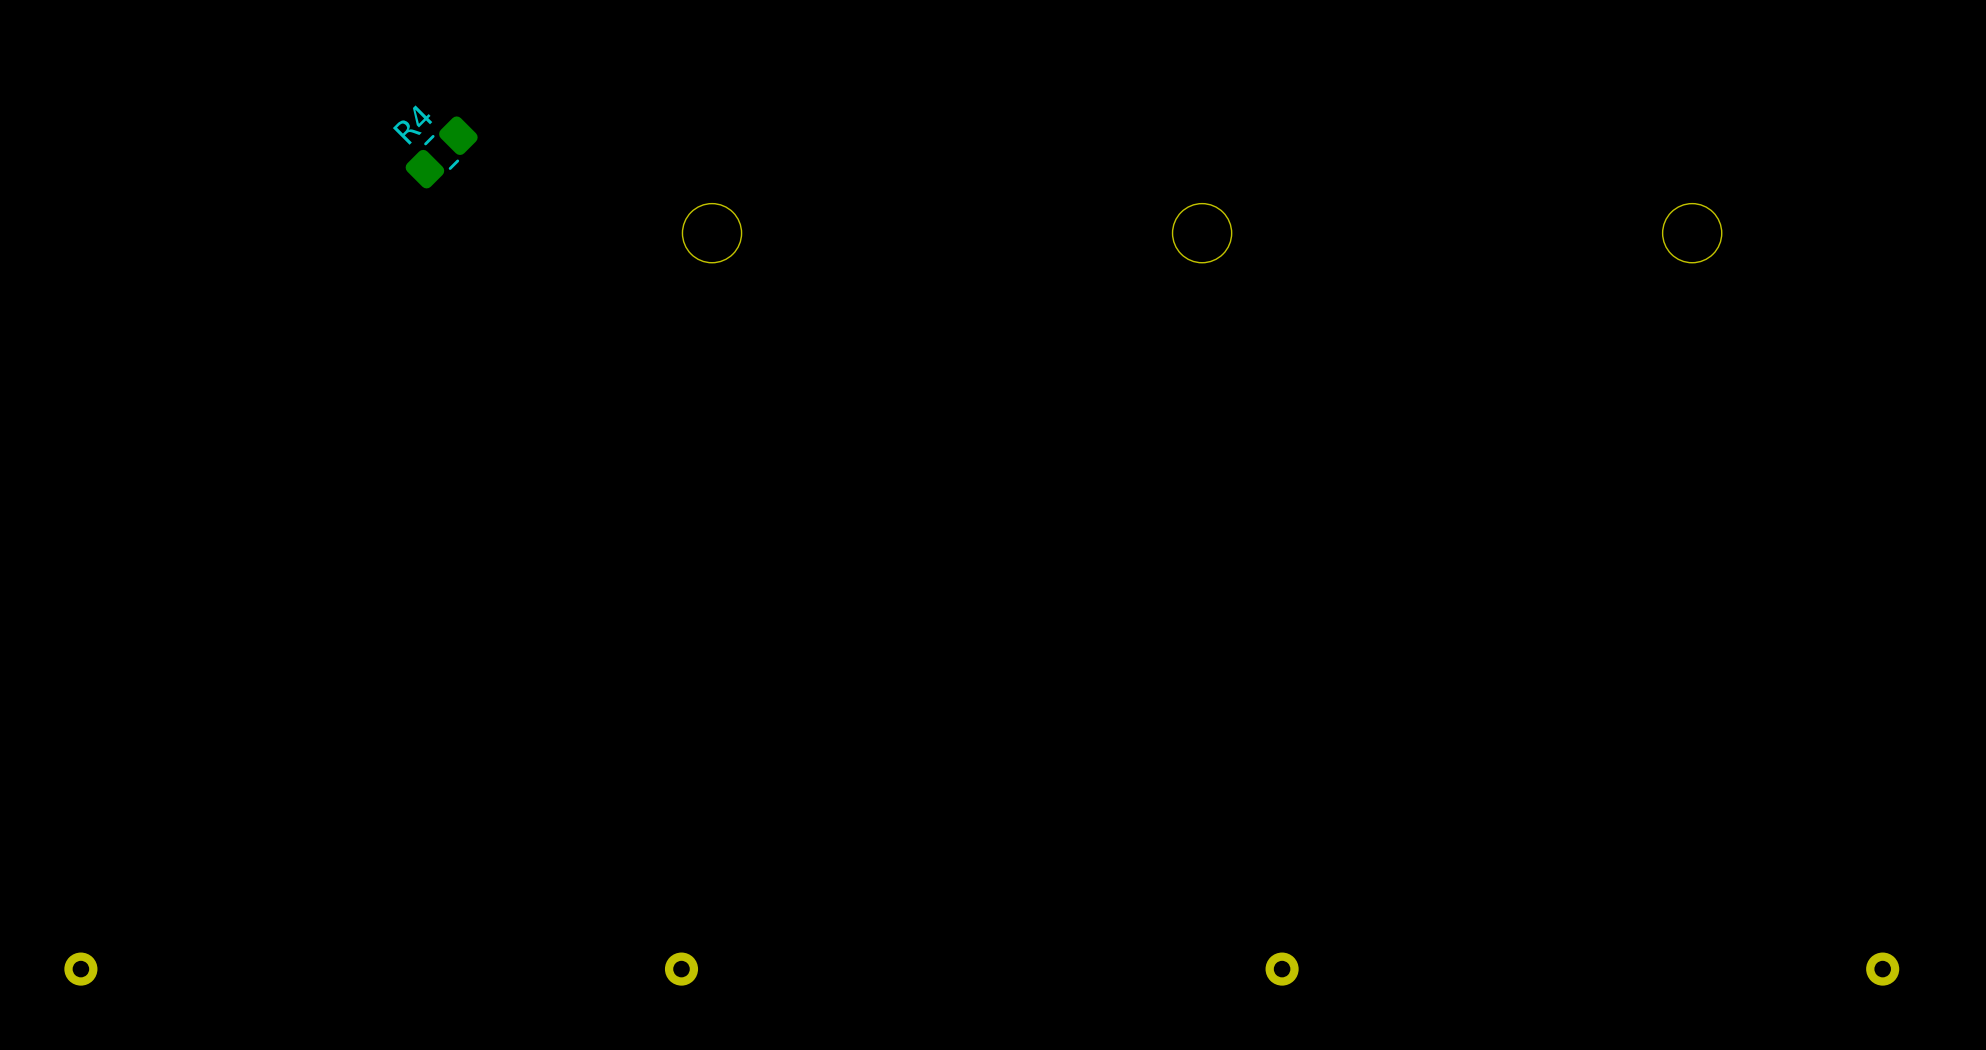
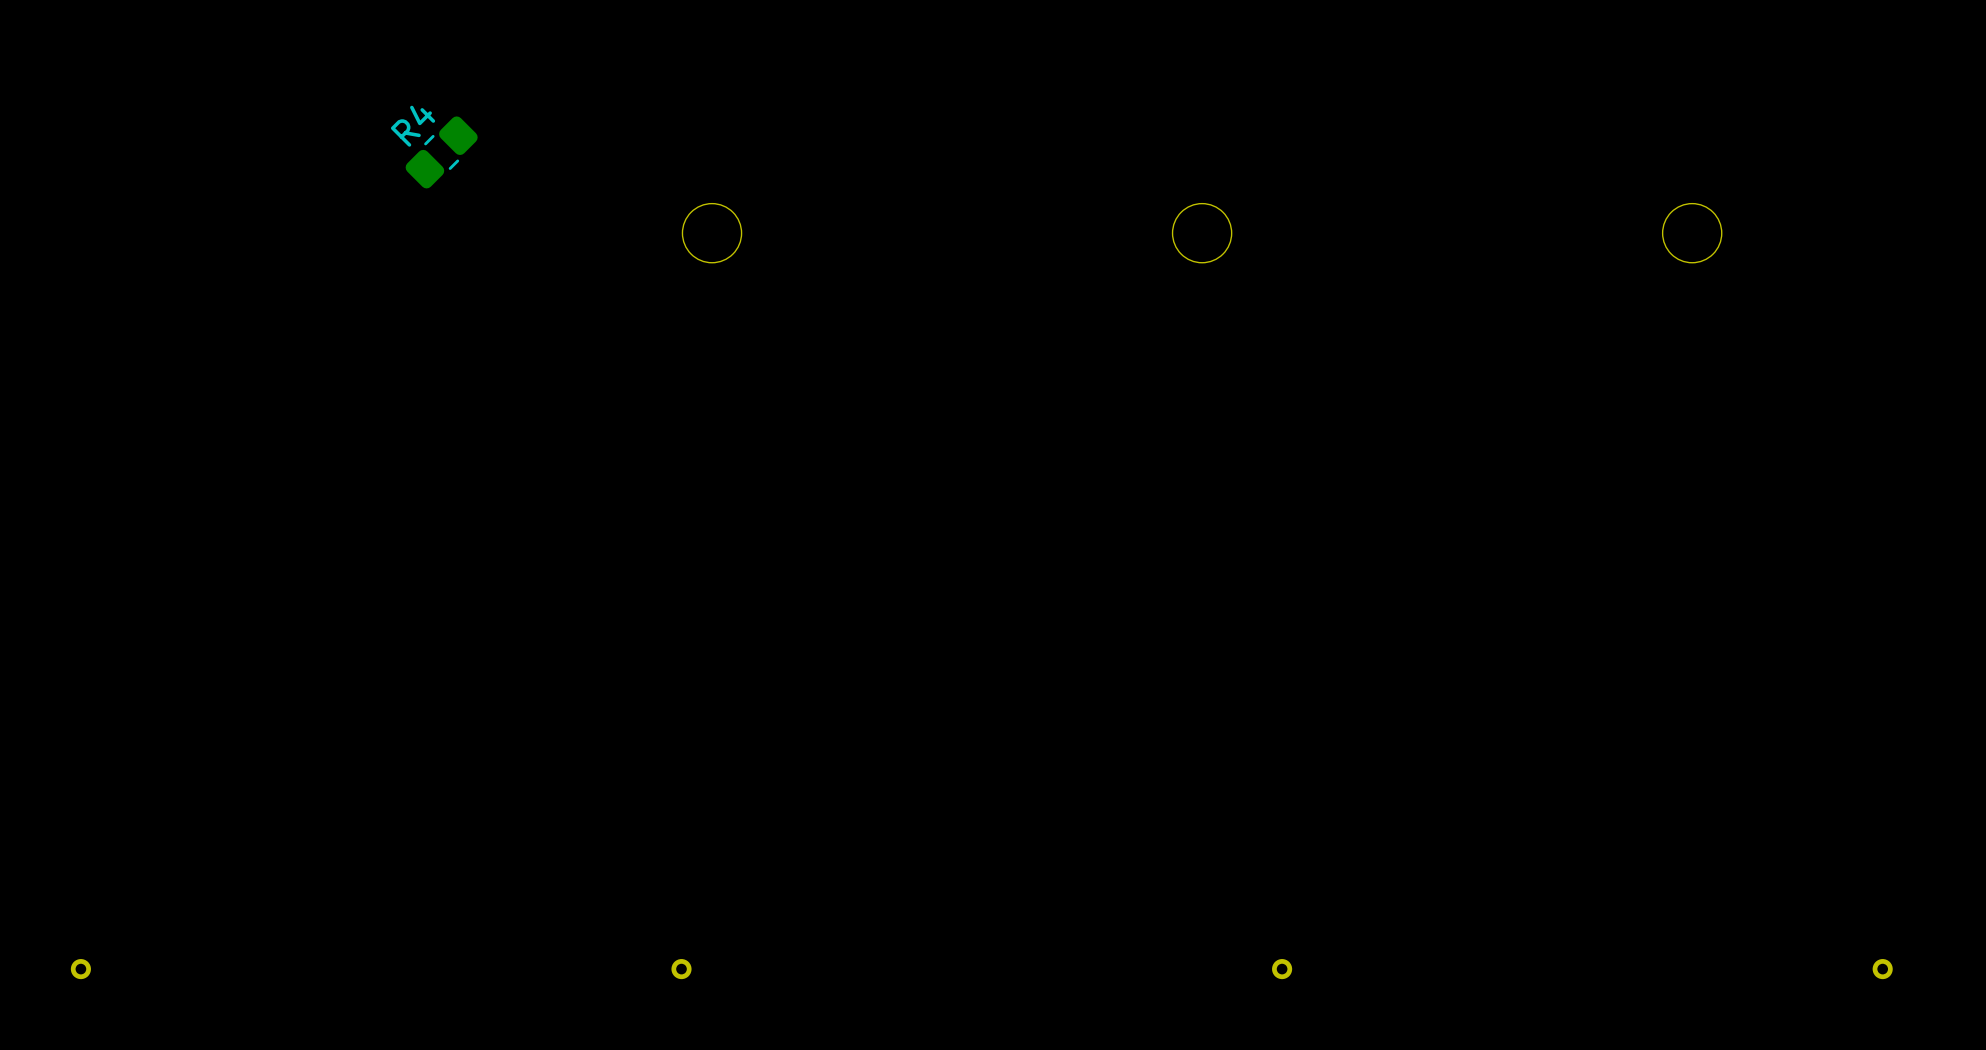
part footprint: [64, 952, 98, 986] -> [70, 959, 91, 980]
part footprint: [664, 952, 699, 986] -> [671, 959, 692, 980]
part footprint: [1265, 952, 1299, 986] -> [1272, 959, 1293, 980]
part footprint: [1866, 952, 1900, 986] -> [1872, 959, 1893, 980]

